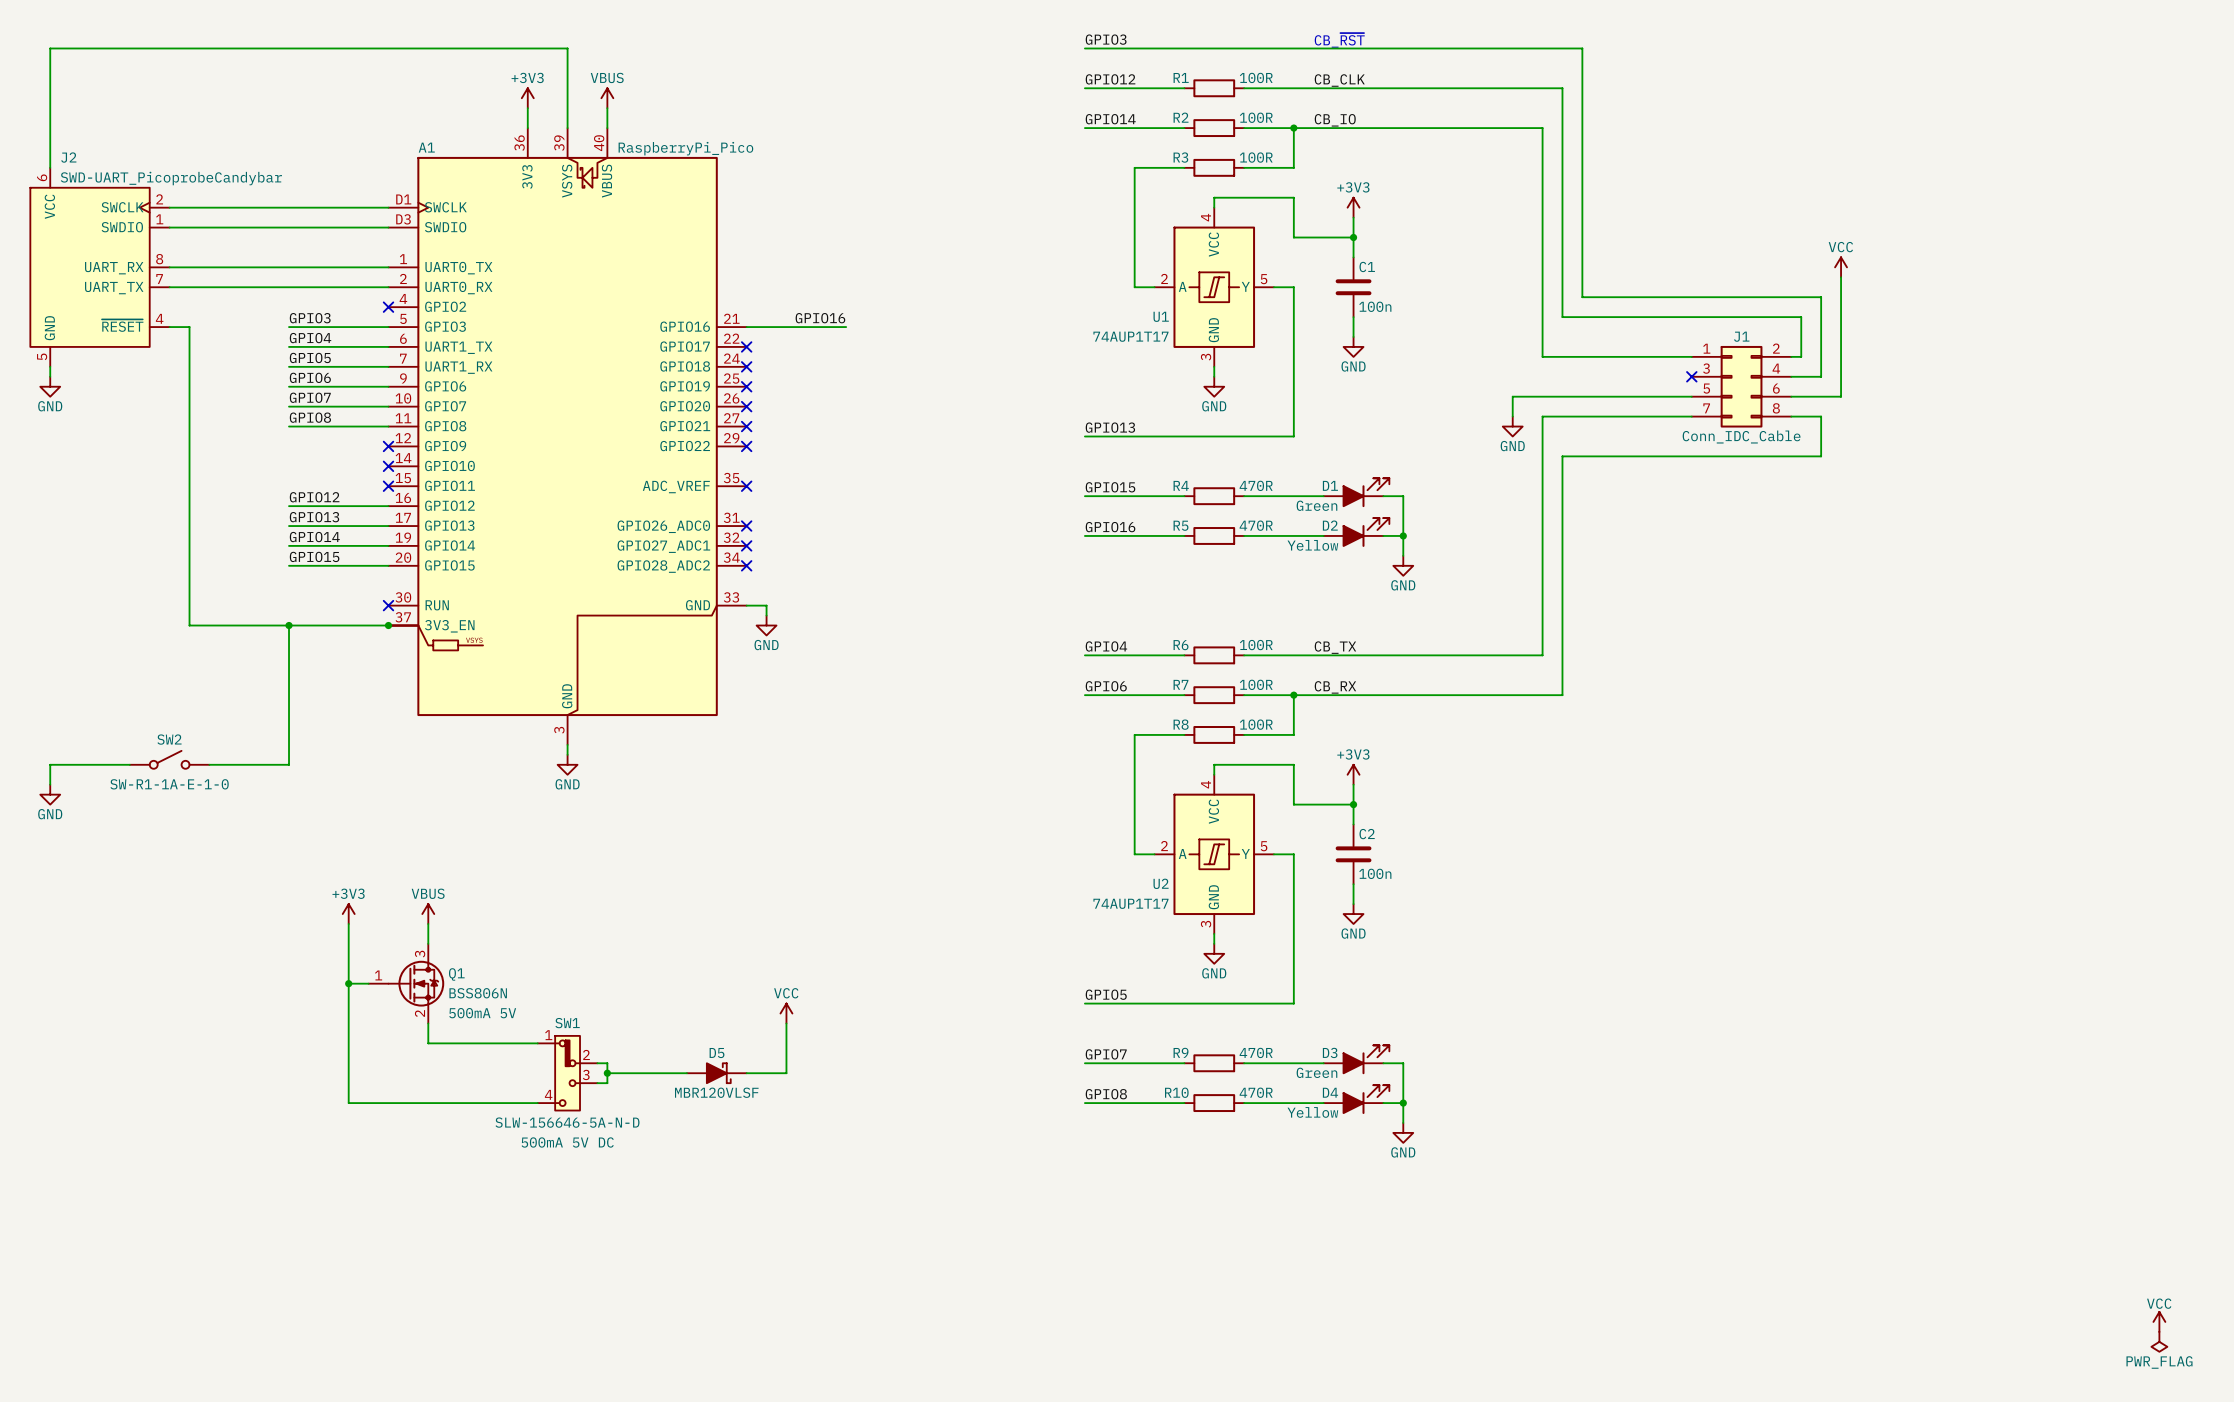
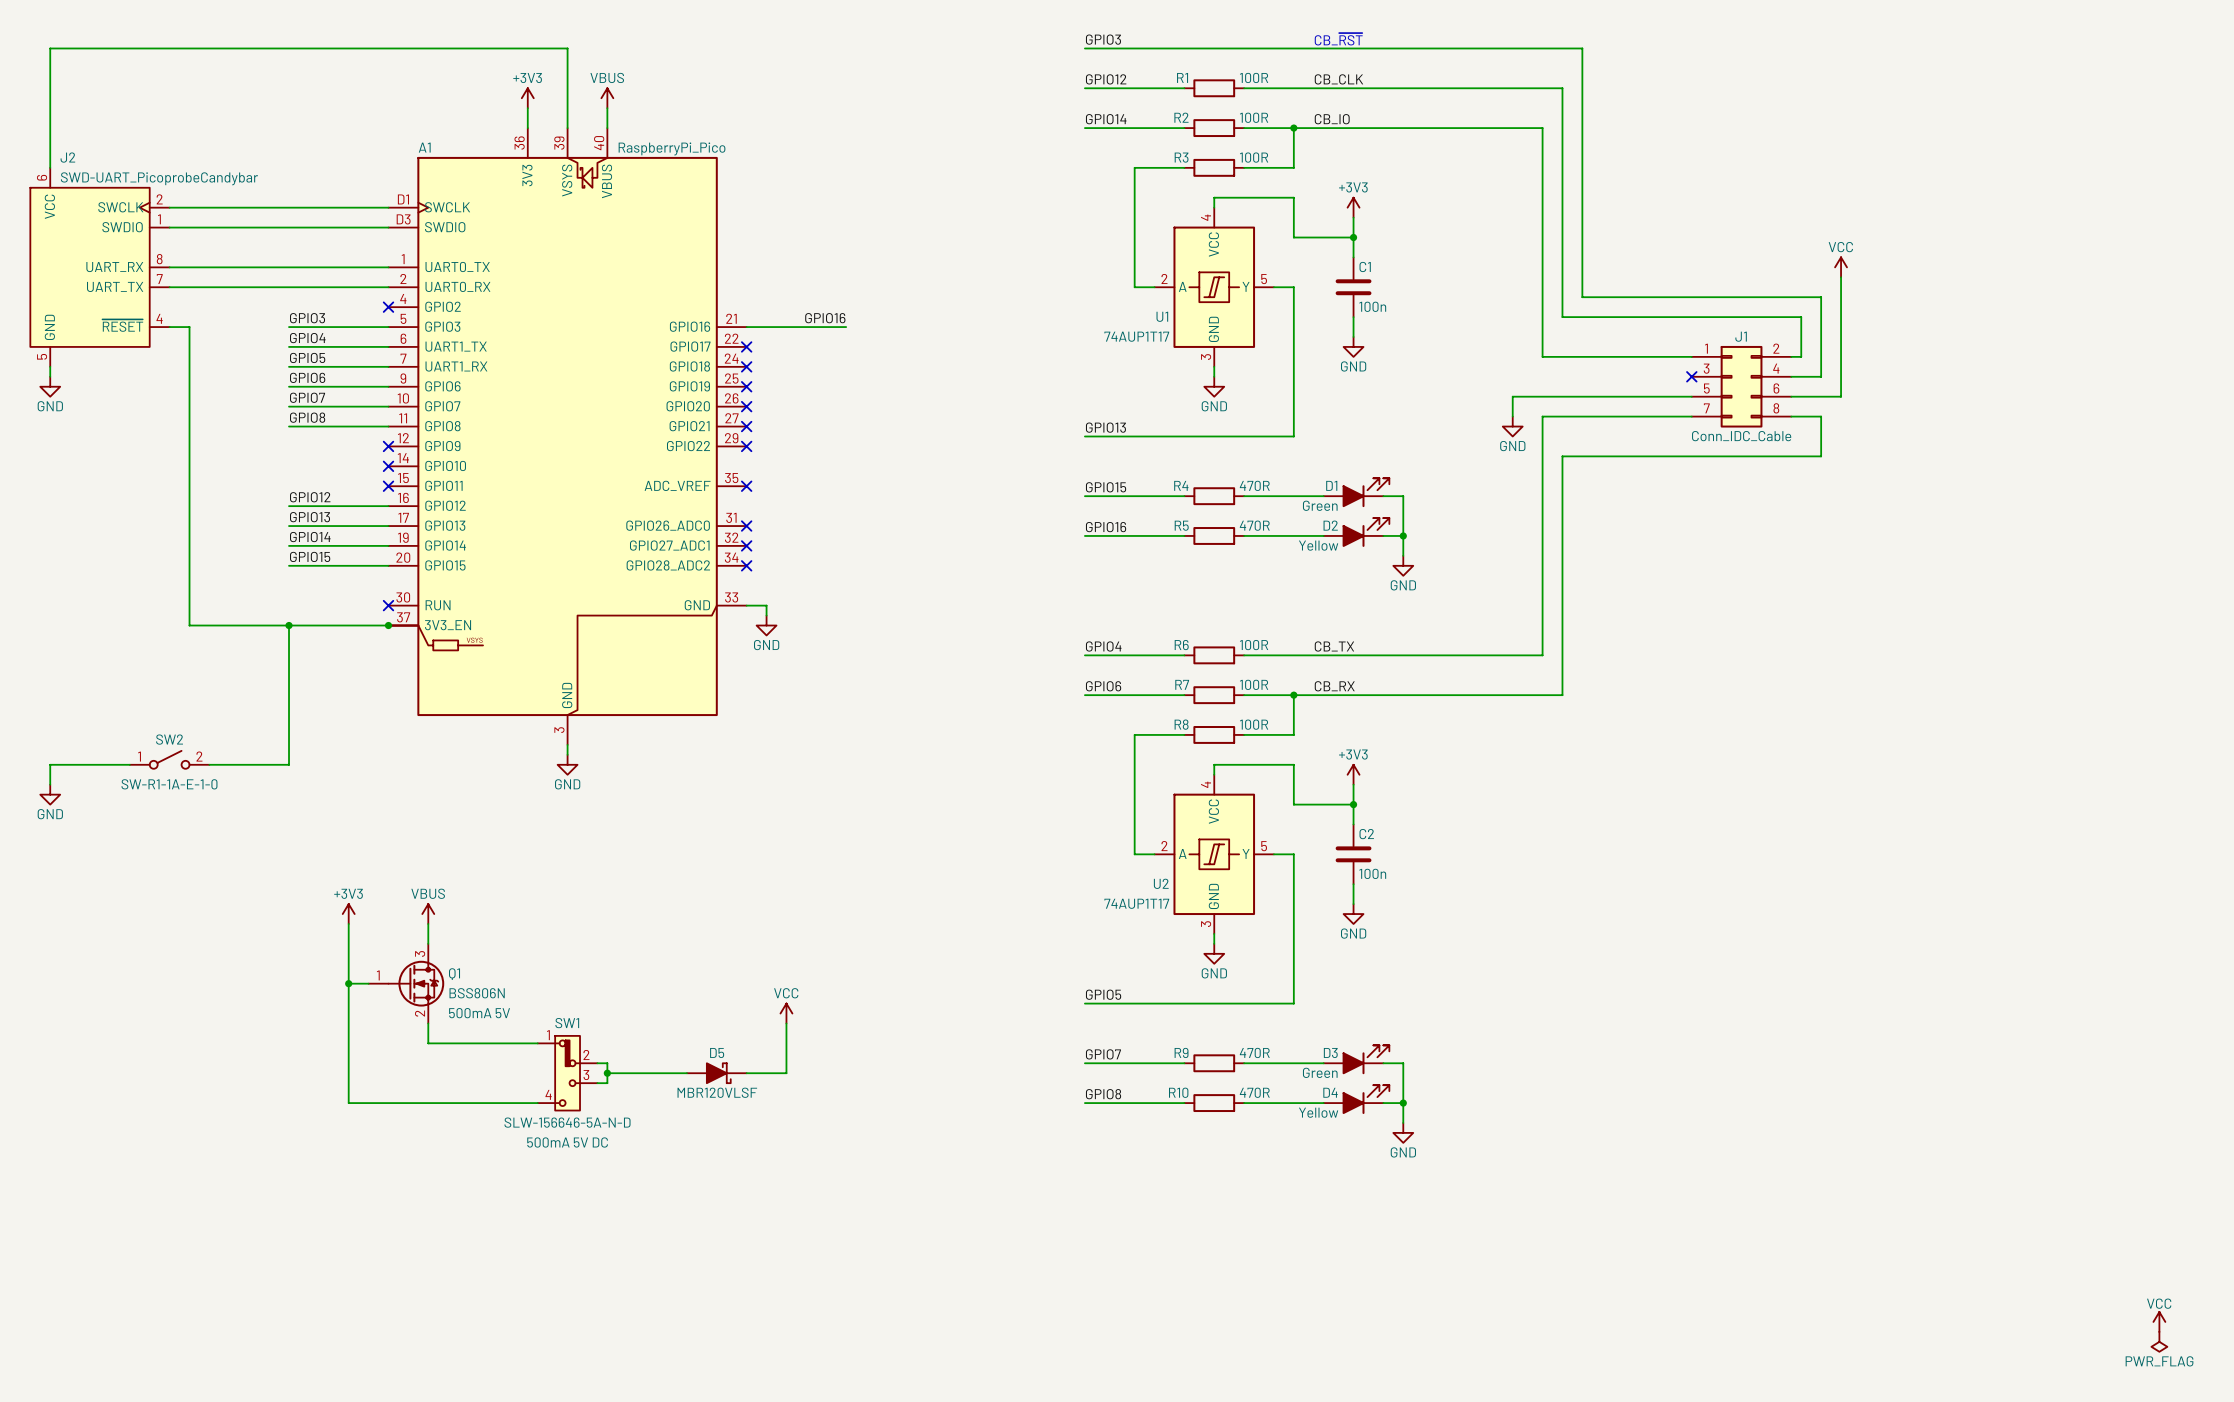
SW2 pin number: none -> 1 (139, 756)
SW2 pin number: none -> 2 (199, 756)

